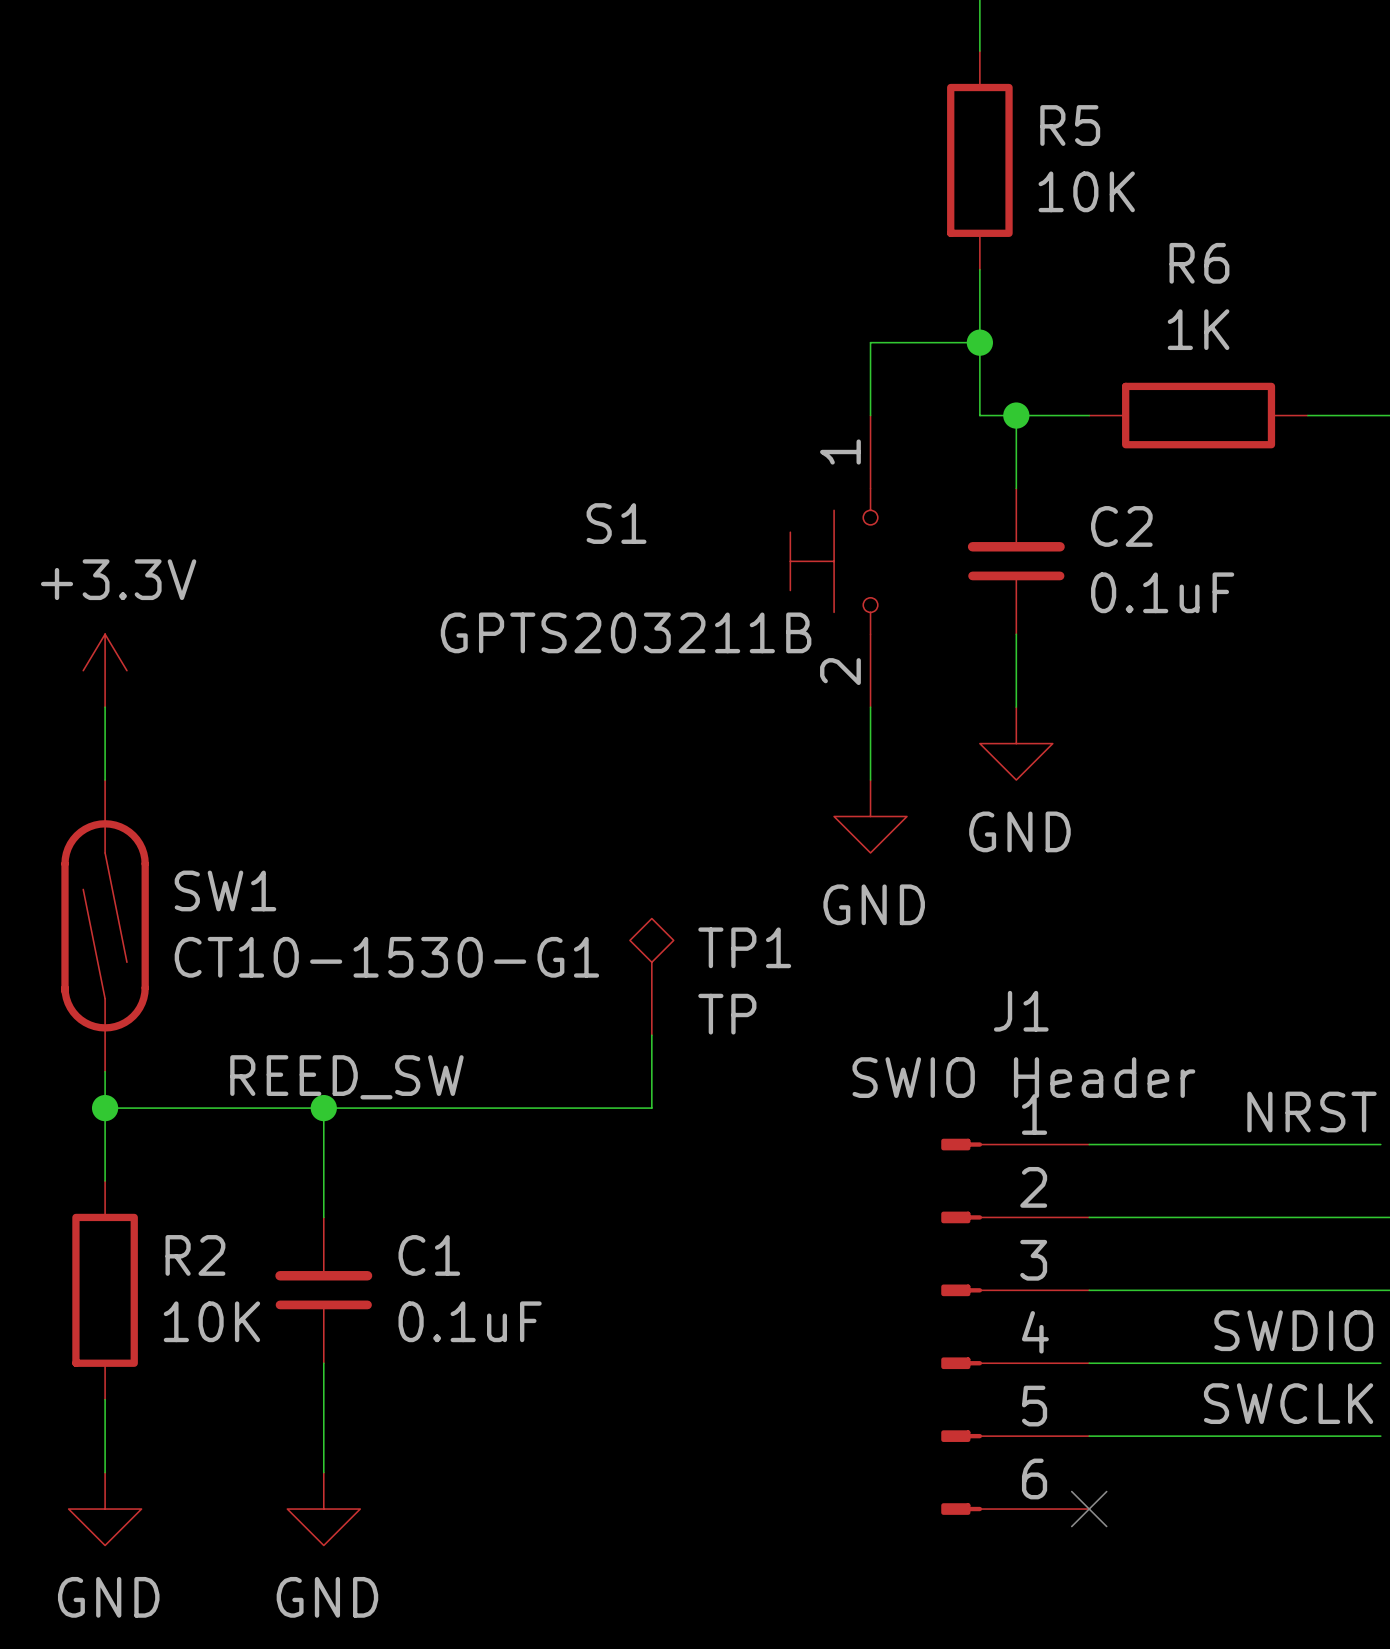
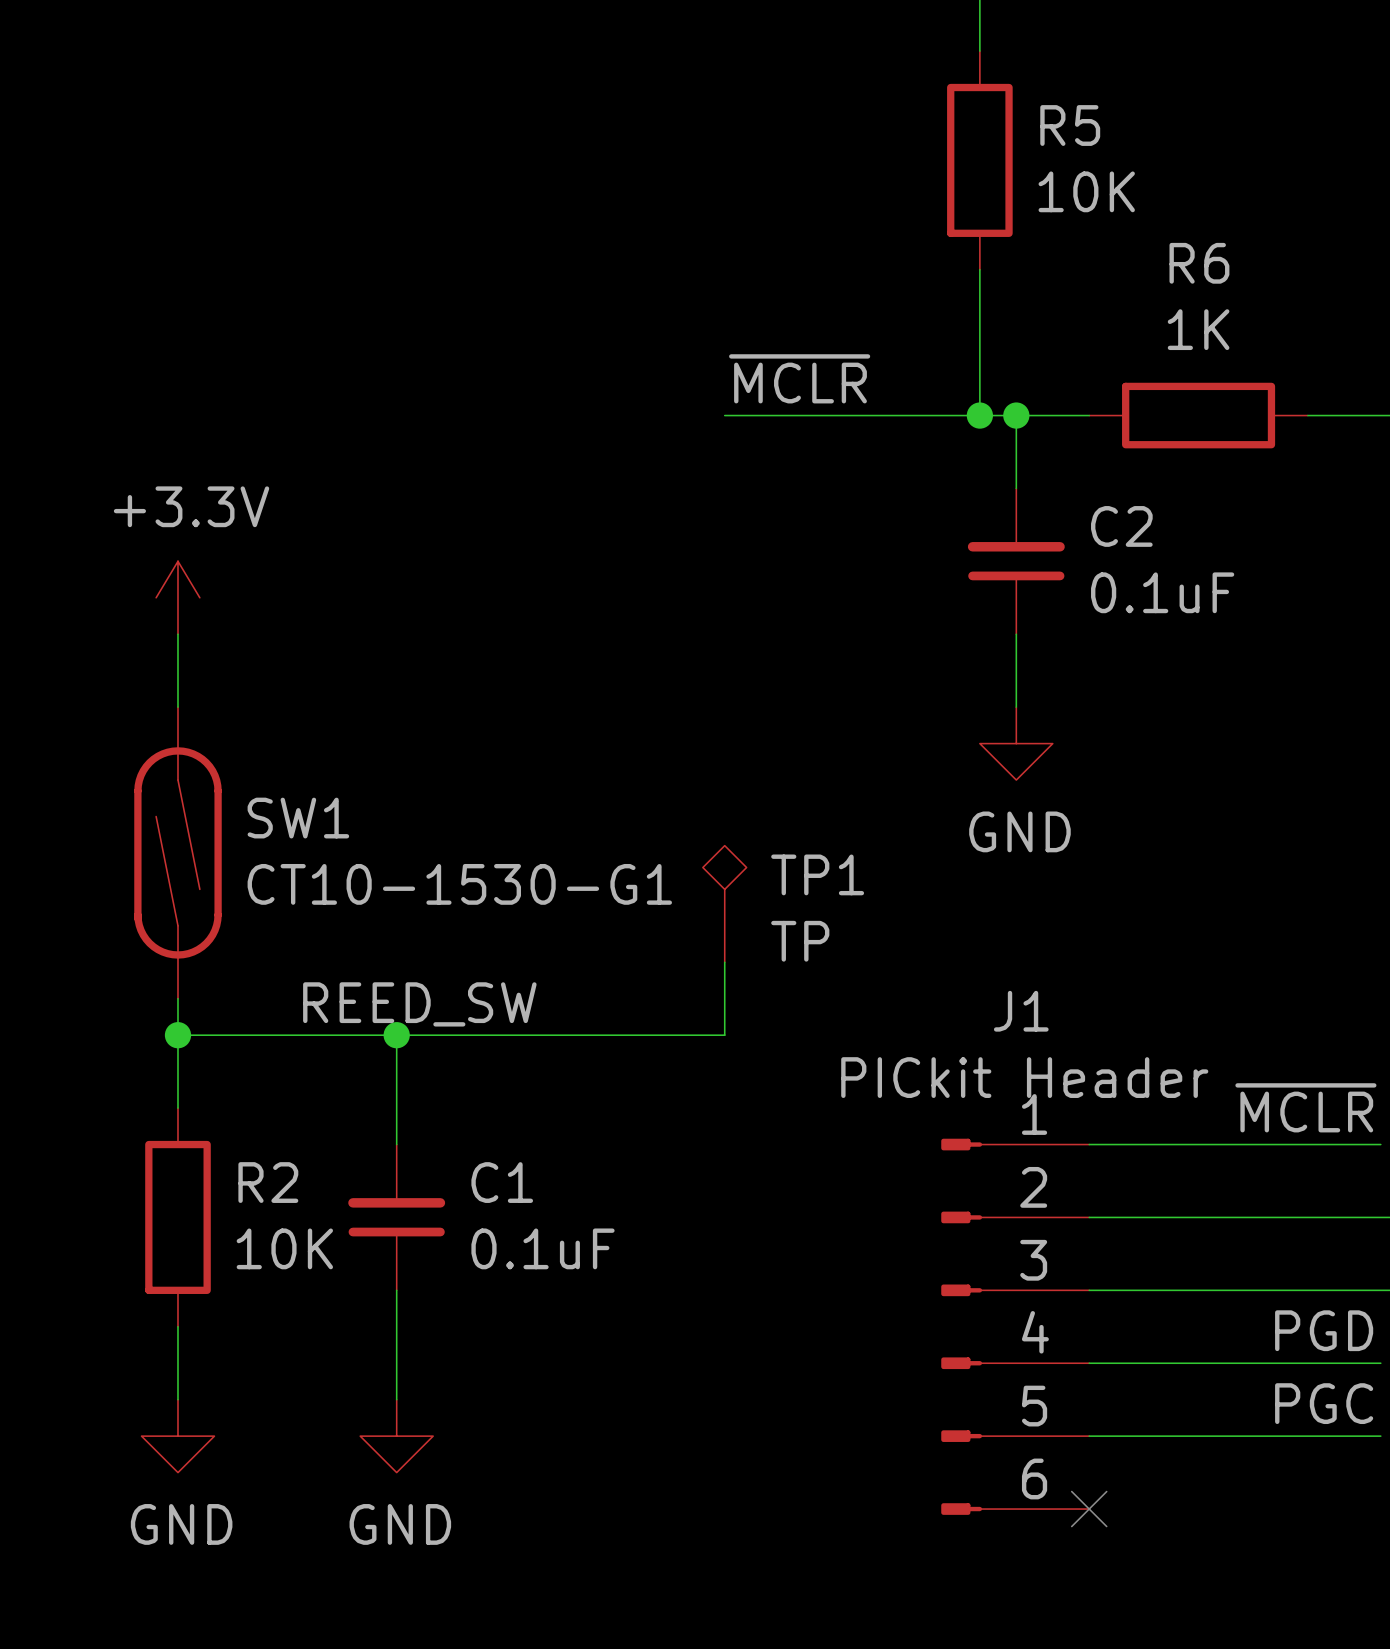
wire: (979, 342) (870, 342) (870, 415) -> none
junction position: (979, 342) -> (979, 415)
label: none -> ~{MCLR} (799, 378)
wire: none -> (724, 415) (979, 415)
S1: GPTS203211B (834, 561) -> none
power symbol position: +3.3V (105, 670) -> +3.3V (177, 597)
wire: (105, 707) (105, 780) -> (177, 634) (177, 707)
wire: (870, 707) (870, 780) -> none
power symbol: GND (870, 816) -> none
SW1 position: (105, 925) -> (177, 852)
TP1 position: (651, 976) -> (724, 903)
junction: none -> (177, 1035)
junction: none -> (396, 1035)
wire: (651, 1035) (651, 1108) (105, 1108) -> (724, 962) (724, 1035) (177, 1035)
wire: (105, 1071) (105, 1180) -> (177, 998) (177, 1108)
label position: REED_SW (346, 1077) -> REED_SW (419, 1004)
J1 value: SWIO Header (1023, 1077) -> PICkit Header (1024, 1077)
junction: (105, 1108) -> none
wire: (323, 1108) (323, 1217) -> (396, 1035) (396, 1144)
junction: (323, 1108) -> none
label: NRST (1311, 1112) -> ~{MCLR} (1305, 1107)
R2 position: (105, 1290) -> (177, 1217)
C1 position: (323, 1290) -> (396, 1217)
label: SWDIO (1293, 1330) -> PGD (1324, 1330)
wire: (323, 1363) (323, 1472) -> (396, 1290) (396, 1399)
wire: (105, 1399) (105, 1472) -> (177, 1326) (177, 1399)
label: SWCLK (1288, 1403) -> PGC (1324, 1403)
power symbol: none -> GND (177, 1436)
power symbol: none -> GND (396, 1436)
power symbol: GND (105, 1509) -> none
power symbol: GND (323, 1509) -> none

